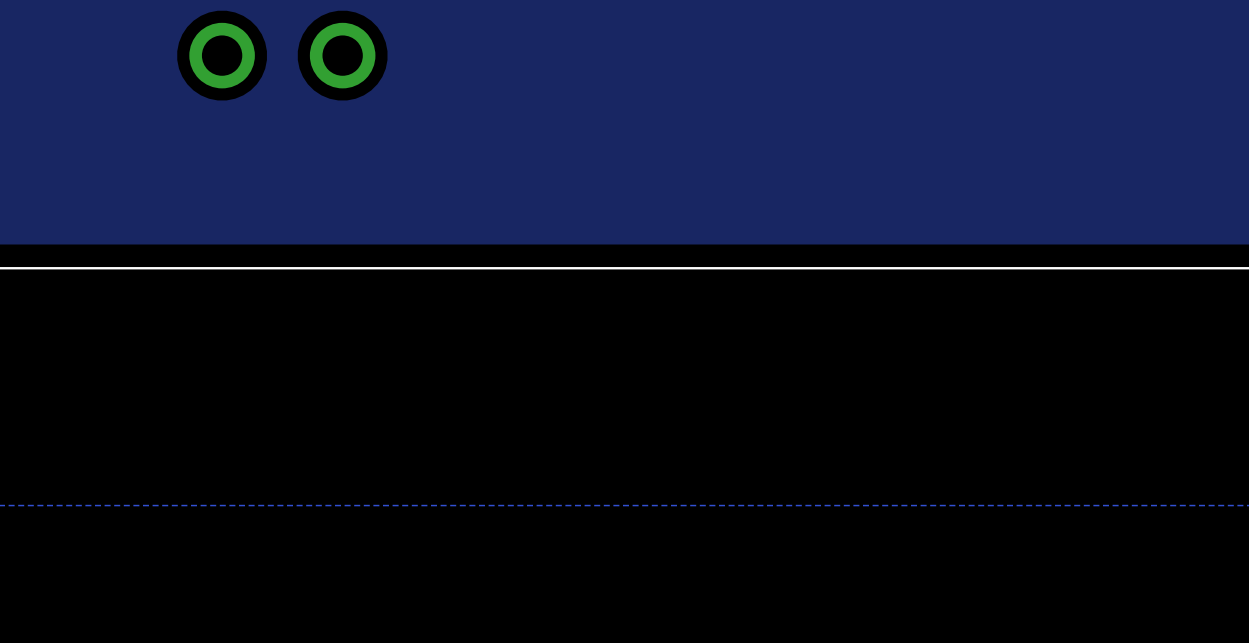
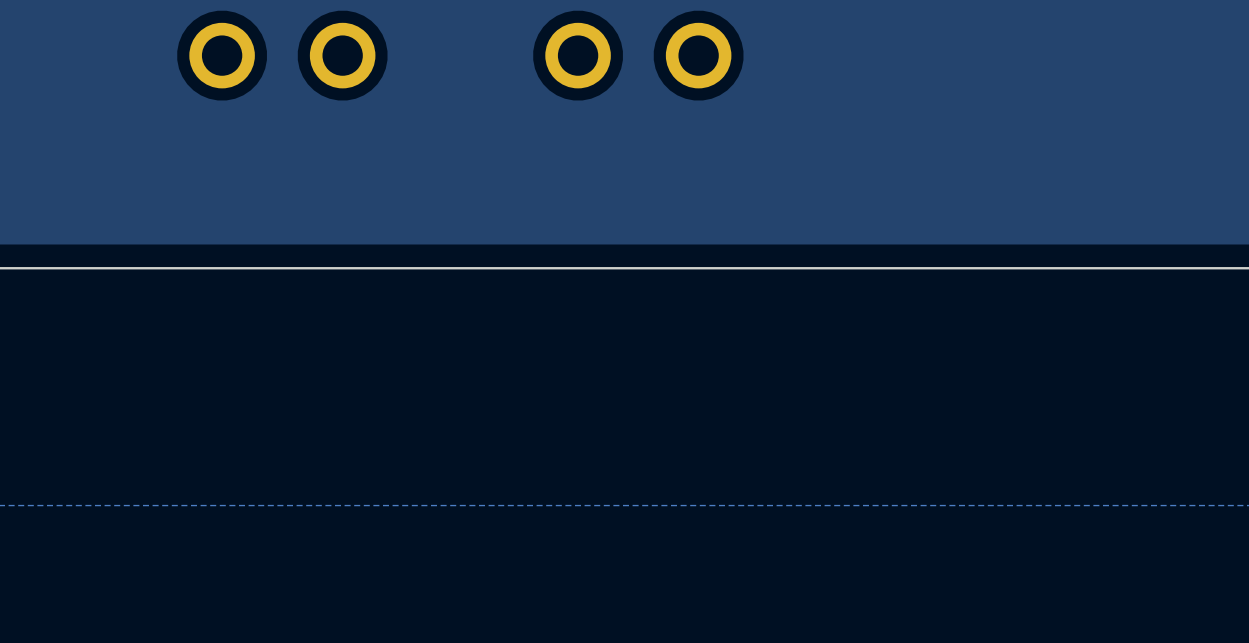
part: none -> (638, 55)

